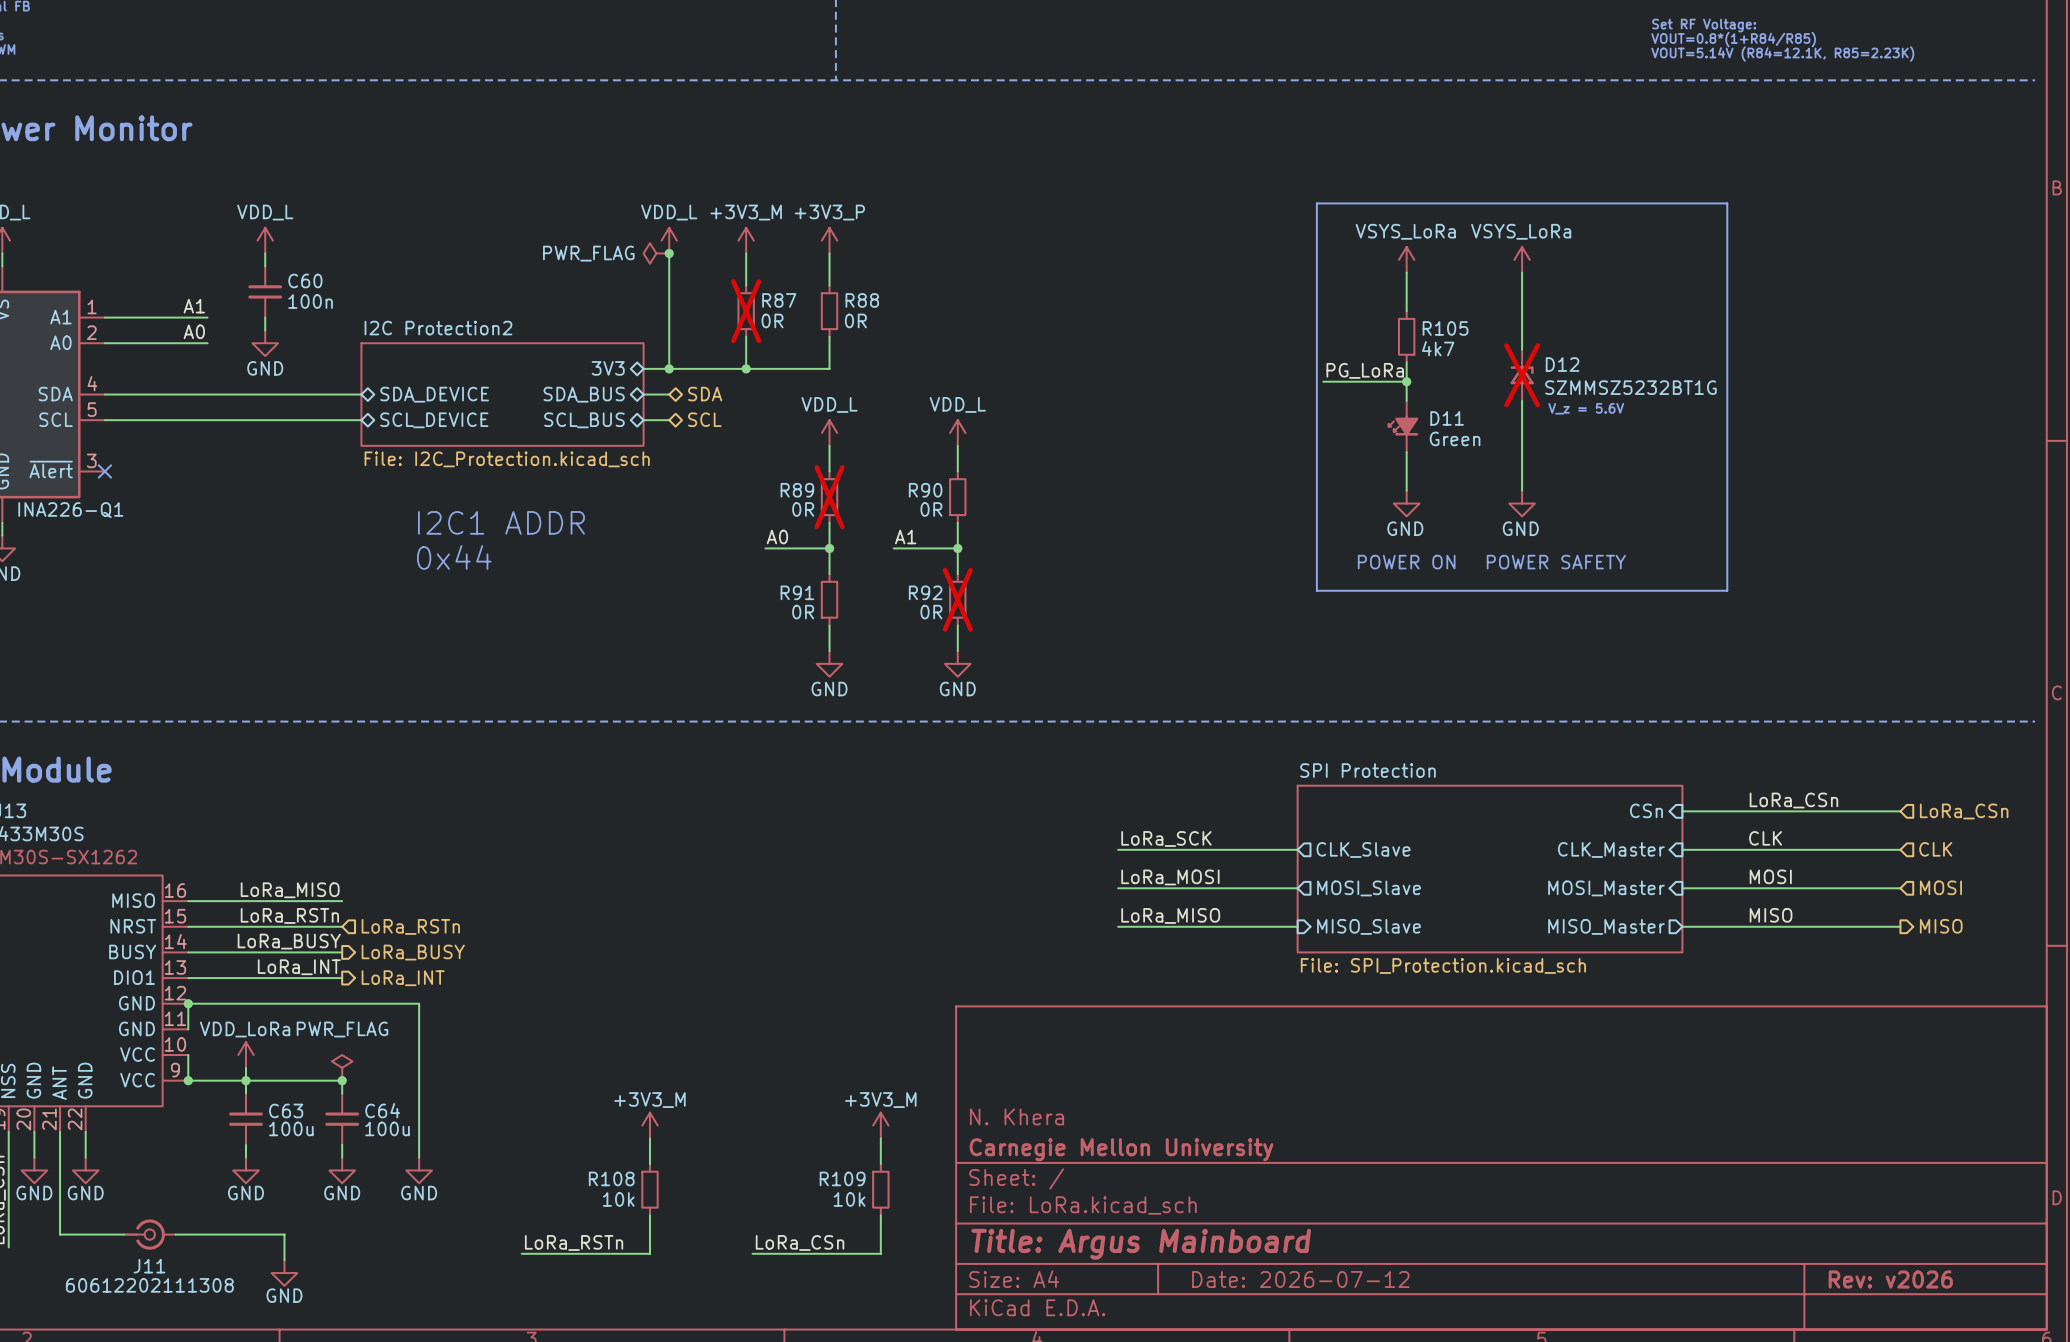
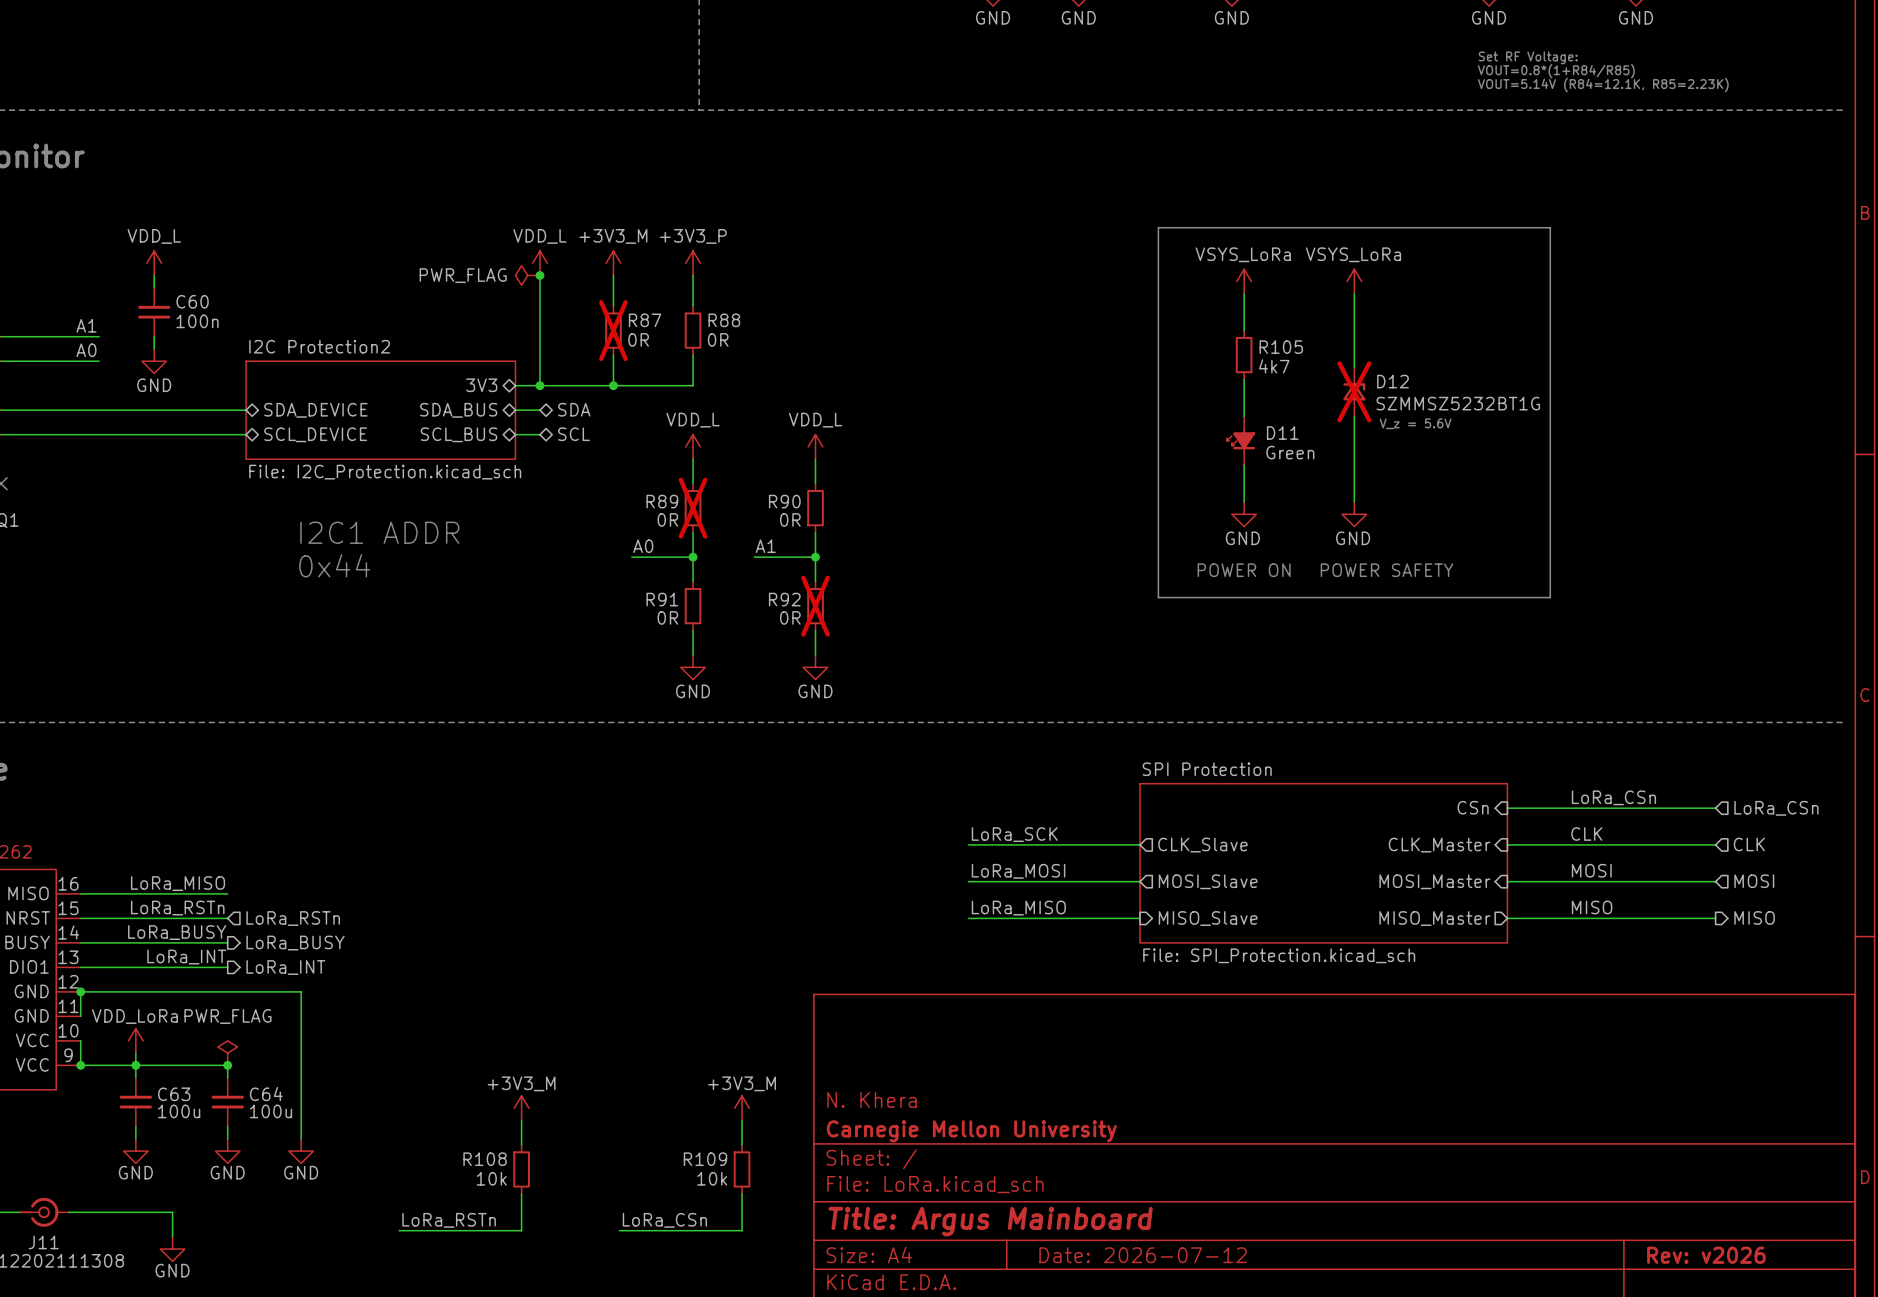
label: PG_LoRa (1365, 370) -> none
wire: (1323, 381) (1406, 381) -> none
junction: (1406, 381) -> none

